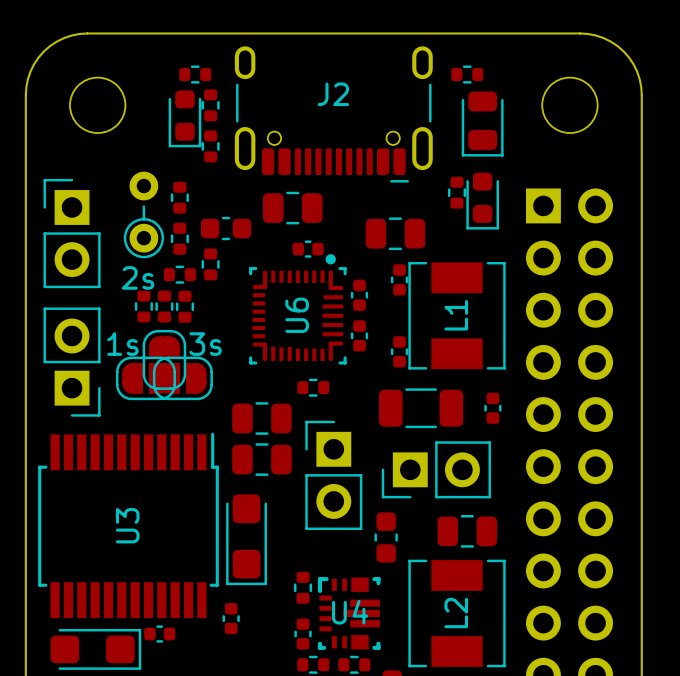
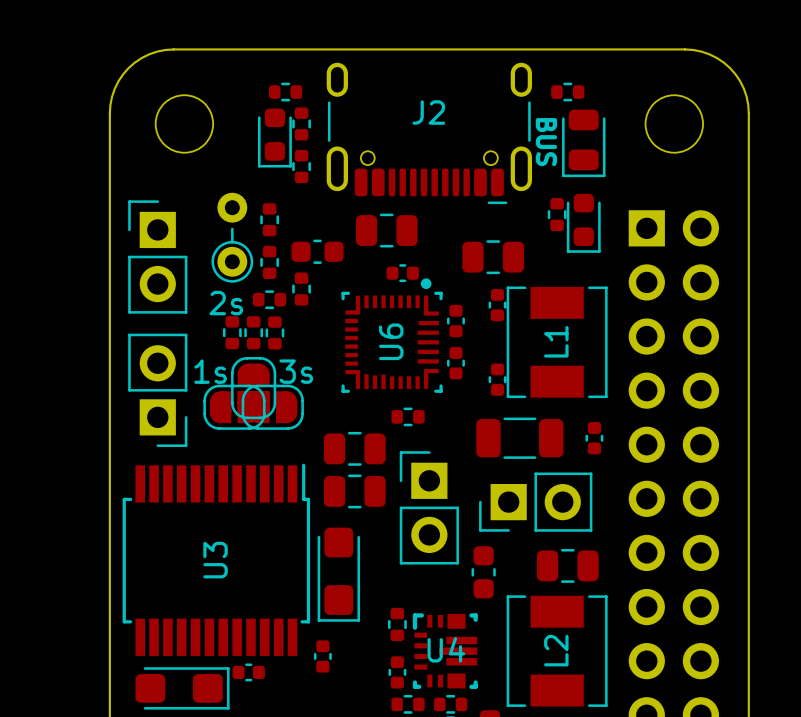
text: none -> BUS (546, 142)

